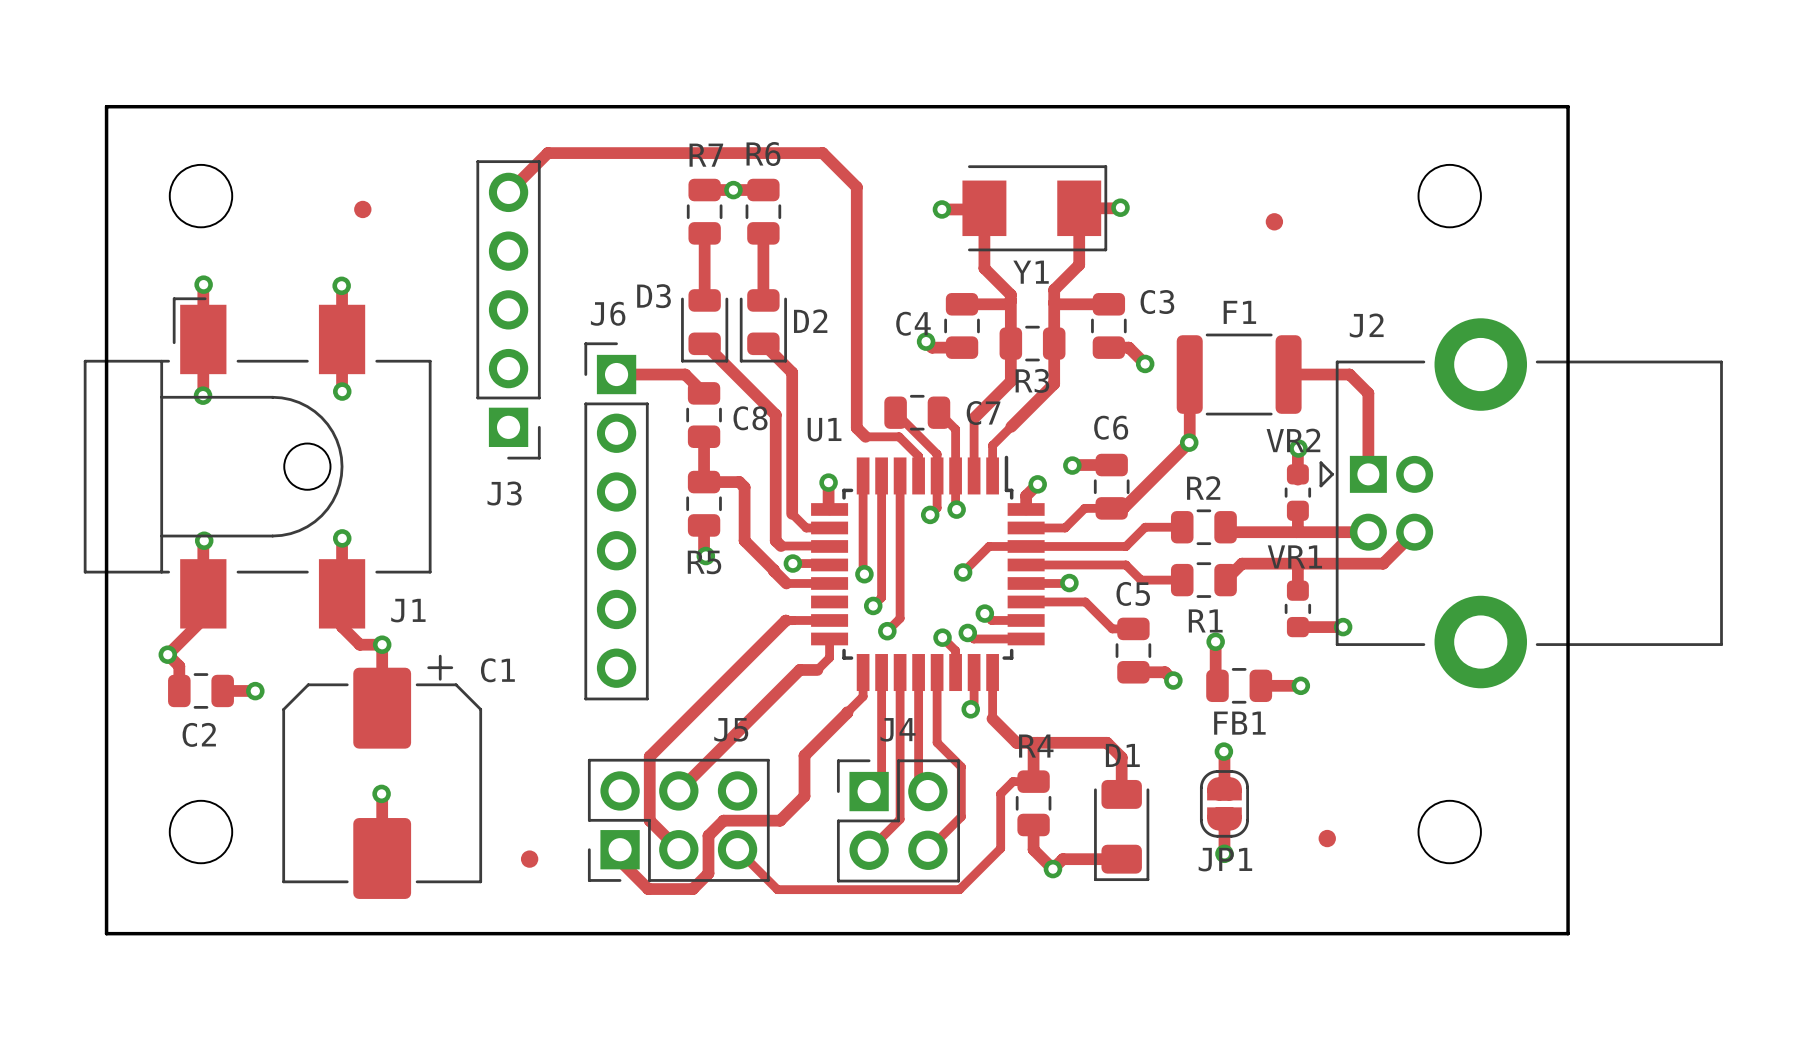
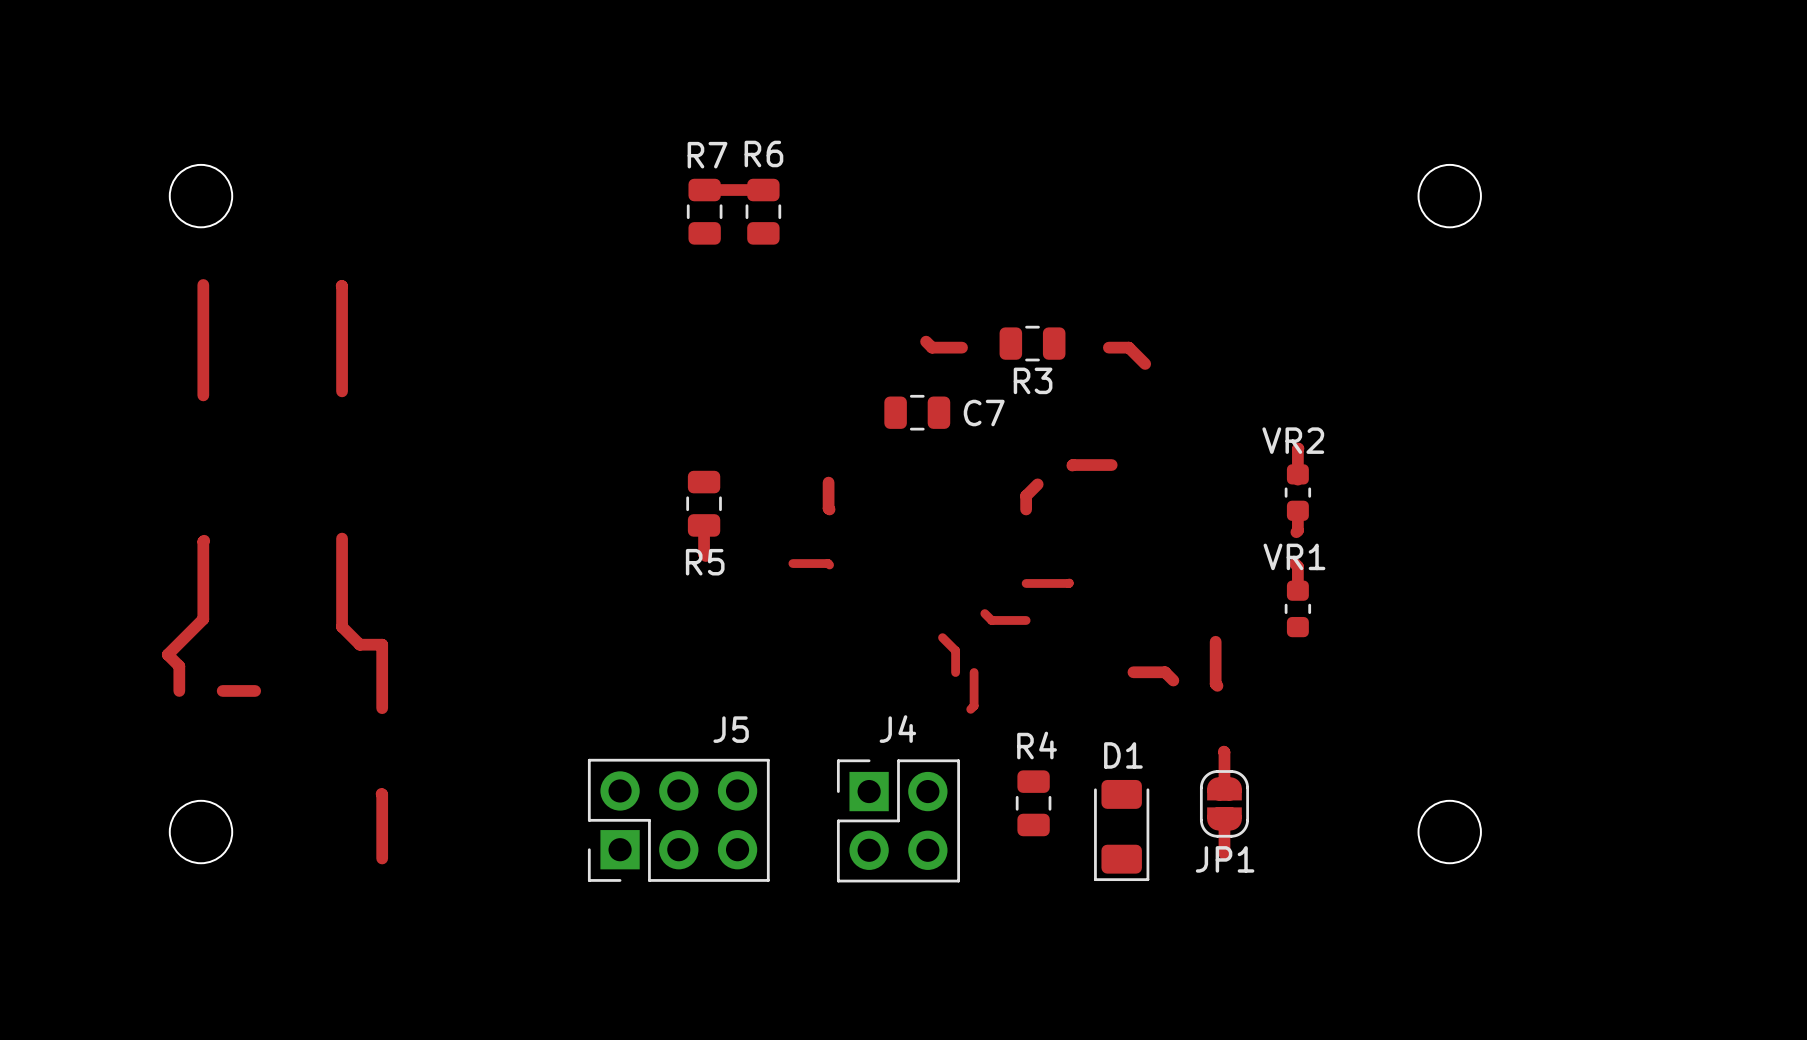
board edge: (106, 106) (1568, 106) (1568, 933) (106, 933) (106, 106) -> none
via: (733, 190) -> none
track: (508, 192) (547, 153) (822, 153) (856, 187) (856, 427) (865, 436) (899, 436) (918, 456) (918, 475) -> none
track: (1120, 207) (1079, 208) (1079, 264) (1054, 289) (1054, 383) (992, 445) (992, 475) -> none
via: (1120, 207) -> none
Y1: (1034, 208) -> none
part: (362, 209) -> none
track: (941, 209) (984, 208) (984, 268) (1010, 294) (1010, 381) (974, 417) -> none
via: (941, 209) -> none
part: (1274, 221) -> none
track: (704, 233) (704, 300) -> none
track: (763, 233) (763, 300) -> none
via: (203, 284) -> none
via: (341, 285) -> none
track: (1010, 300) (1007, 304) (962, 304) -> none
track: (1054, 302) (1108, 304) -> none
J3: (508, 309) -> none
D3: (704, 325) -> none
D2: (763, 325) -> none
C4: (962, 325) -> none
C3: (1108, 325) -> none
via: (926, 341) -> none
track: (704, 343) (775, 414) (775, 540) (781, 546) (829, 546) -> none
track: (763, 343) (792, 372) (792, 513) (806, 527) (829, 527) -> none
via: (1145, 363) -> none
track: (616, 374) (685, 374) (704, 393) -> none
track: (1189, 374) (1189, 442) (1123, 508) (1084, 508) (1065, 527) (1026, 527) -> none
F1: (1239, 374) -> none
track: (1288, 374) (1349, 374) (1368, 393) (1368, 474) -> none
via: (342, 391) -> none
via: (203, 395) -> none
track: (895, 412) (937, 454) (937, 508) (930, 514) -> none
track: (938, 412) (955, 429) (956, 509) -> none
C8: (704, 415) -> none
track: (974, 418) (974, 475) -> none
track: (704, 436) (704, 482) (739, 482) (744, 487) (744, 540) (786, 583) (829, 583) -> none
via: (1189, 442) -> none
via: (1298, 448) -> none
J1: (257, 462) -> none
via: (1072, 465) -> none
track: (863, 475) (864, 574) -> none
track: (881, 475) (881, 597) (873, 605) -> none
track: (900, 475) (900, 618) (887, 631) -> none
via: (828, 482) -> none
via: (1037, 484) -> none
C6: (1111, 486) -> none
J2: (1521, 503) -> none
via: (956, 509) -> none
via: (930, 514) -> none
J6: (616, 521) -> none
track: (1182, 527) (1145, 527) (1125, 546) (989, 546) (963, 572) -> none
R2: (1203, 527) -> none
track: (1225, 527) (1230, 532) (1368, 532) -> none
track: (1414, 532) (1383, 563) (1242, 563) (1225, 580) -> none
via: (342, 538) -> none
via: (204, 540) -> none
via: (705, 556) -> none
via: (792, 563) -> none
track: (1026, 564) (1125, 564) (1141, 580) (1182, 580) -> none
via: (963, 572) -> none
U1: (927, 573) -> none
via: (864, 574) -> none
R1: (1203, 580) -> none
via: (1069, 583) -> none
track: (1026, 601) (1085, 601) (1112, 628) (1133, 628) -> none
via: (873, 605) -> none
via: (984, 613) -> none
track: (829, 620) (785, 620) (649, 756) (649, 820) (678, 849) -> none
track: (1297, 627) (1343, 627) -> none
via: (1343, 627) -> none
via: (887, 631) -> none
track: (967, 632) (973, 638) (1026, 638) -> none
via: (967, 632) -> none
via: (942, 637) -> none
track: (829, 638) (829, 657) (817, 669) (799, 669) (678, 790) -> none
via: (1215, 641) -> none
via: (382, 644) -> none
C5: (1133, 650) -> none
via: (167, 654) -> none
track: (863, 672) (863, 696) (804, 755) (804, 796) (780, 820) (723, 820) (708, 835) (708, 873) (692, 889) (648, 889) (620, 860) (620, 849) -> none
track: (881, 672) (881, 779) (869, 791) -> none
track: (900, 672) (900, 819) (869, 850) -> none
track: (918, 672) (918, 782) (927, 791) -> none
track: (937, 672) (937, 742) (961, 766) (961, 816) (927, 850) -> none
track: (992, 672) (992, 718) -> none
via: (1173, 680) -> none
FB1: (1239, 685) -> none
track: (1260, 685) (1300, 685) -> none
via: (1300, 685) -> none
C2: (200, 690) -> none
via: (255, 691) -> none
via: (970, 709) -> none
track: (992, 718) (1016, 742) (1107, 742) (1121, 757) (1121, 794) -> none
track: (1037, 742) (1033, 746) (1033, 781) (1012, 781) (1000, 793) (1000, 848) (959, 889) (777, 889) (737, 849) -> none
via: (1223, 751) -> none
C1: (382, 776) -> none
via: (381, 793) -> none
track: (1033, 824) (1033, 849) (1052, 869) (1062, 859) (1121, 859) -> none
part: (1327, 838) -> none
via: (1224, 853) -> none
part: (529, 859) -> none
via: (1052, 869) -> none

